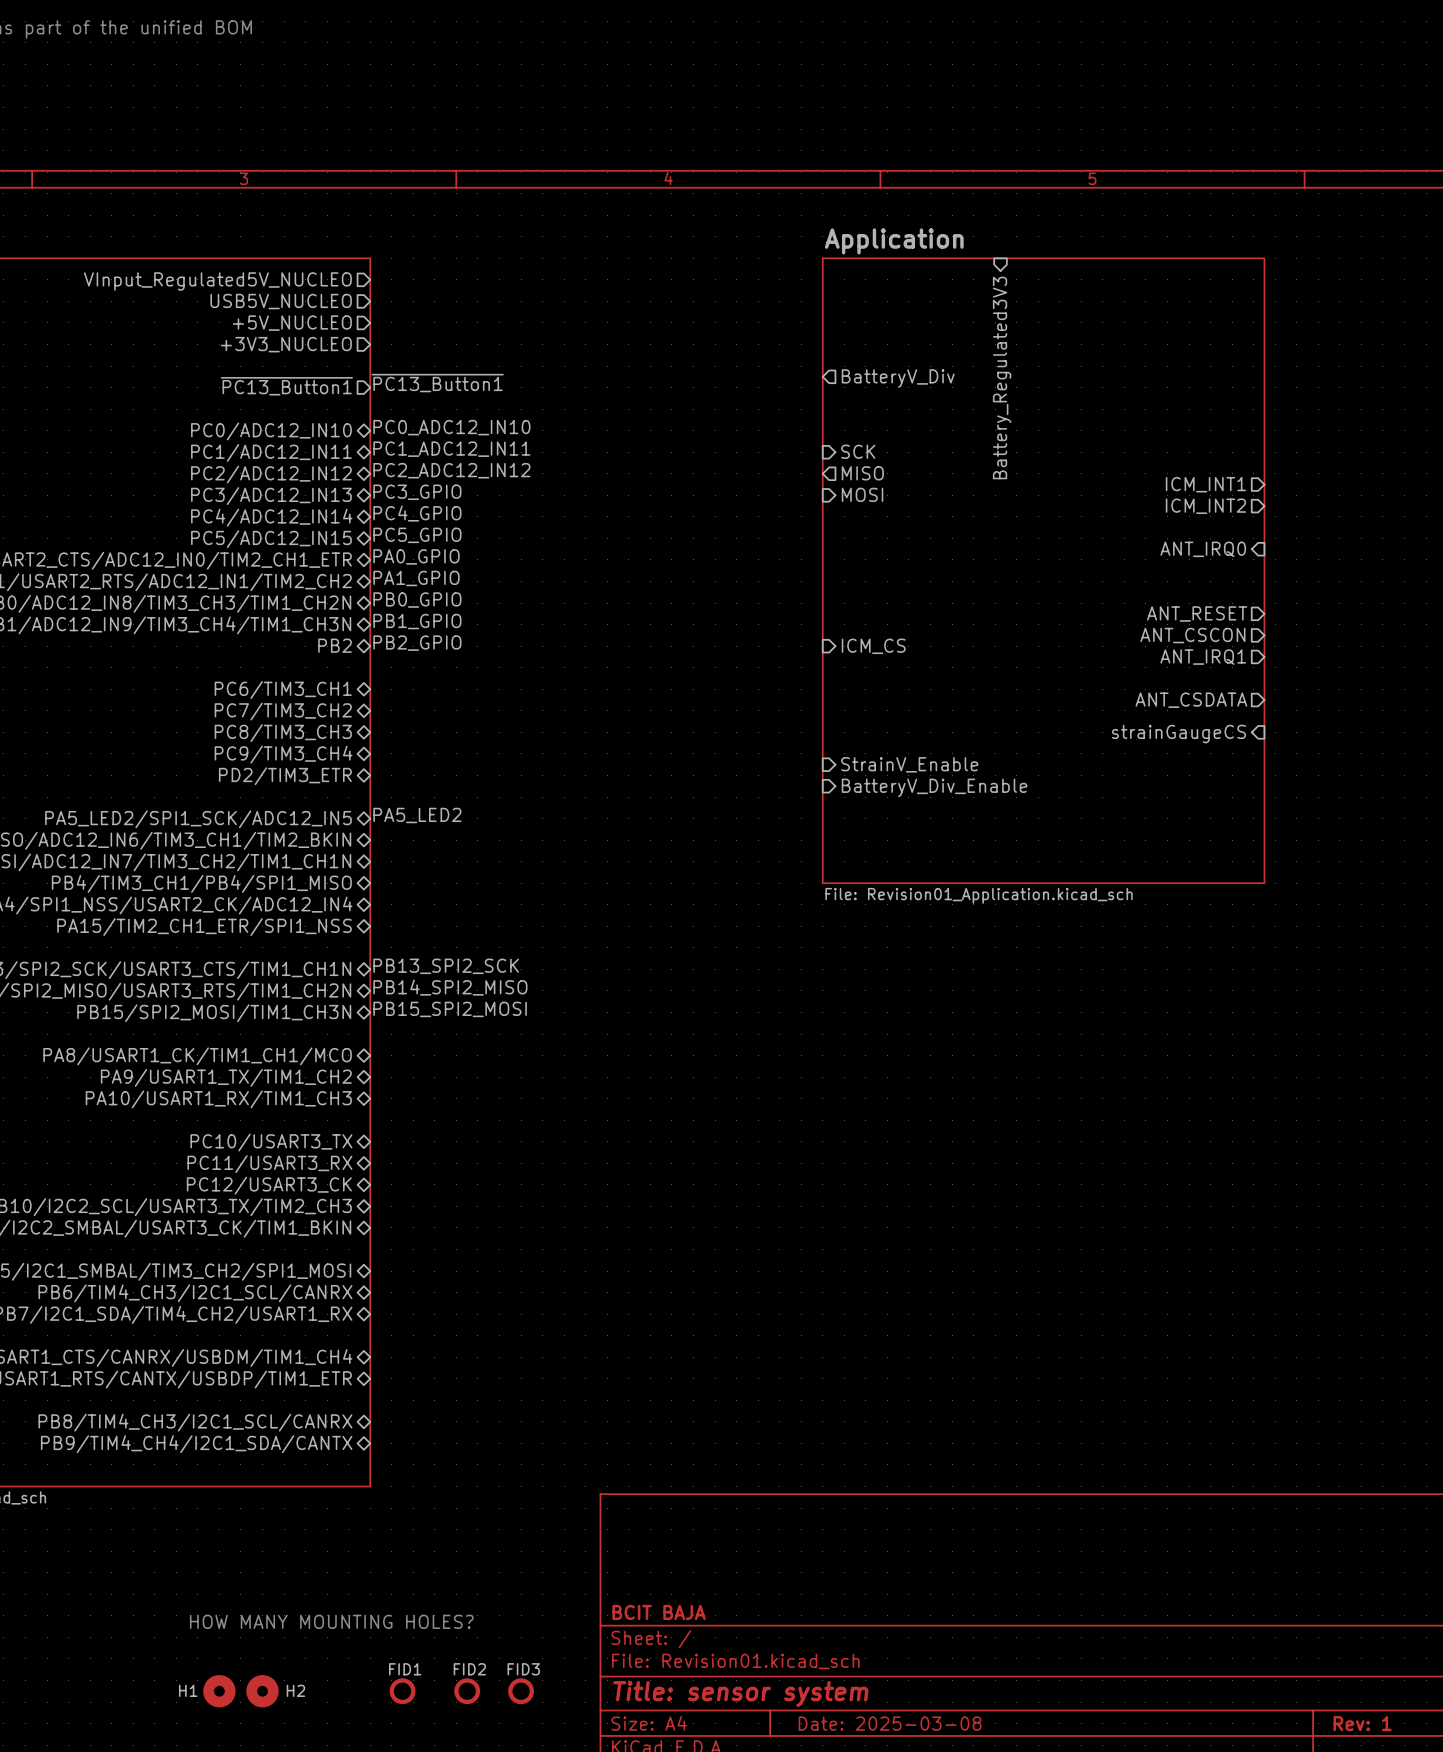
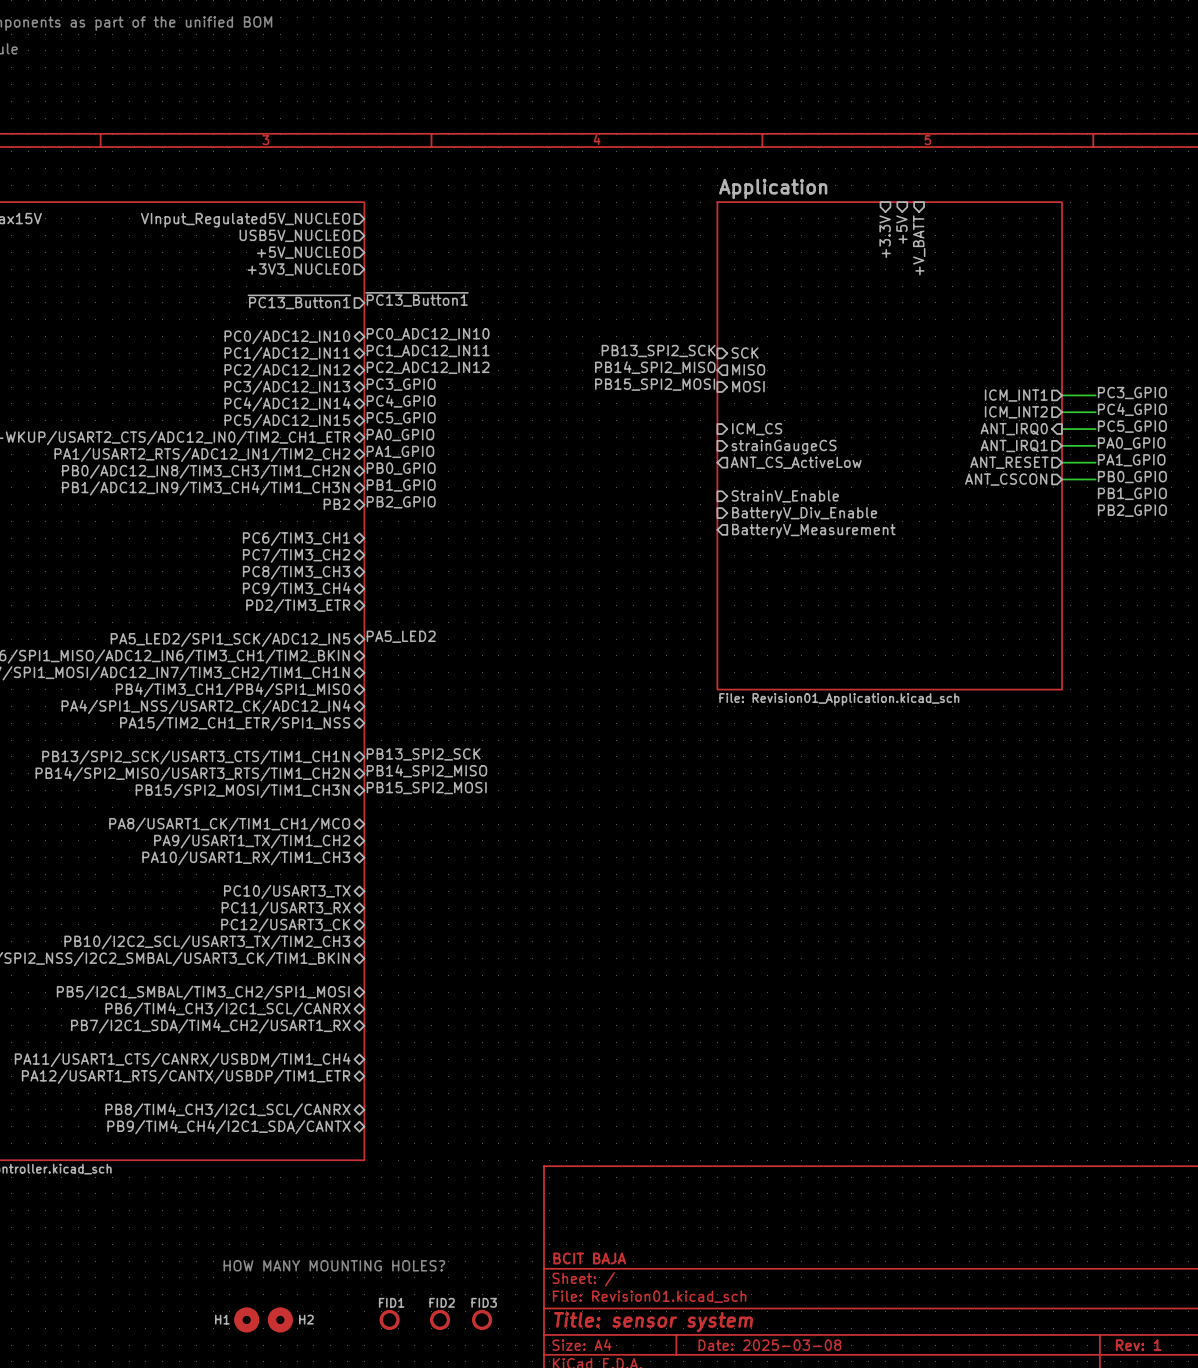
sheet pin: none -> +5V (901, 229)
sheet pin: none -> +3.3V (885, 236)
sheet pin: none -> +V_BATT (919, 245)
sheet pin: Battery_Regulated3V3 (1002, 377) -> none
sheet pin: BatteryV_Div (898, 378) -> none
label: none -> PB13_SPI2_SCK (658, 351)
label: none -> PB14_SPI2_MISO (655, 367)
sheet pin: ICM_INT1 (1205, 484) -> none
label: none -> PB15_SPI2_MOSI (655, 384)
label: none -> PC3_GPIO (1132, 393)
sheet pin: ICM_INT2 (1205, 506) -> ICM_INT1 (1016, 395)
wire: none -> (1061, 395) (1095, 395)
label: none -> PC4_GPIO (1132, 409)
sheet pin: none -> ICM_INT2 (1016, 412)
wire: none -> (1061, 412) (1095, 412)
label: none -> PC5_GPIO (1132, 426)
wire: none -> (1061, 429) (1095, 429)
label: none -> PA0_GPIO (1131, 443)
wire: none -> (1061, 445) (1095, 445)
sheet pin: none -> strainGaugeCS (784, 447)
label: none -> PA1_GPIO (1131, 460)
sheet pin: none -> ANT_CS_ActiveLow (796, 462)
sheet pin: none -> ANT_RESET (1009, 462)
wire: none -> (1061, 462) (1095, 462)
label: none -> PB0_GPIO (1132, 477)
sheet pin: ANT_RESET (1197, 613) -> ANT_CSCON (1006, 479)
wire: none -> (1061, 479) (1095, 479)
label: none -> PB1_GPIO (1132, 493)
sheet pin: ANT_CSCON (1192, 635) -> none
sheet pin position: ICM_CS (873, 646) -> ICM_CS (757, 429)
label: none -> PB2_GPIO (1132, 510)
sheet pin position: ANT_IRQ1 (1203, 657) -> ANT_IRQ1 (1014, 445)
sheet pin: none -> BatteryV_Measurement (813, 531)
sheet pin: ANT_CSDATA (1191, 700) -> none
sheet pin: strainGaugeCS (1179, 734) -> none
sheet pin position: StrainV_Enable (909, 764) -> StrainV_Enable (785, 496)
sheet pin position: BatteryV_Div_Enable (934, 787) -> BatteryV_Div_Enable (804, 514)

